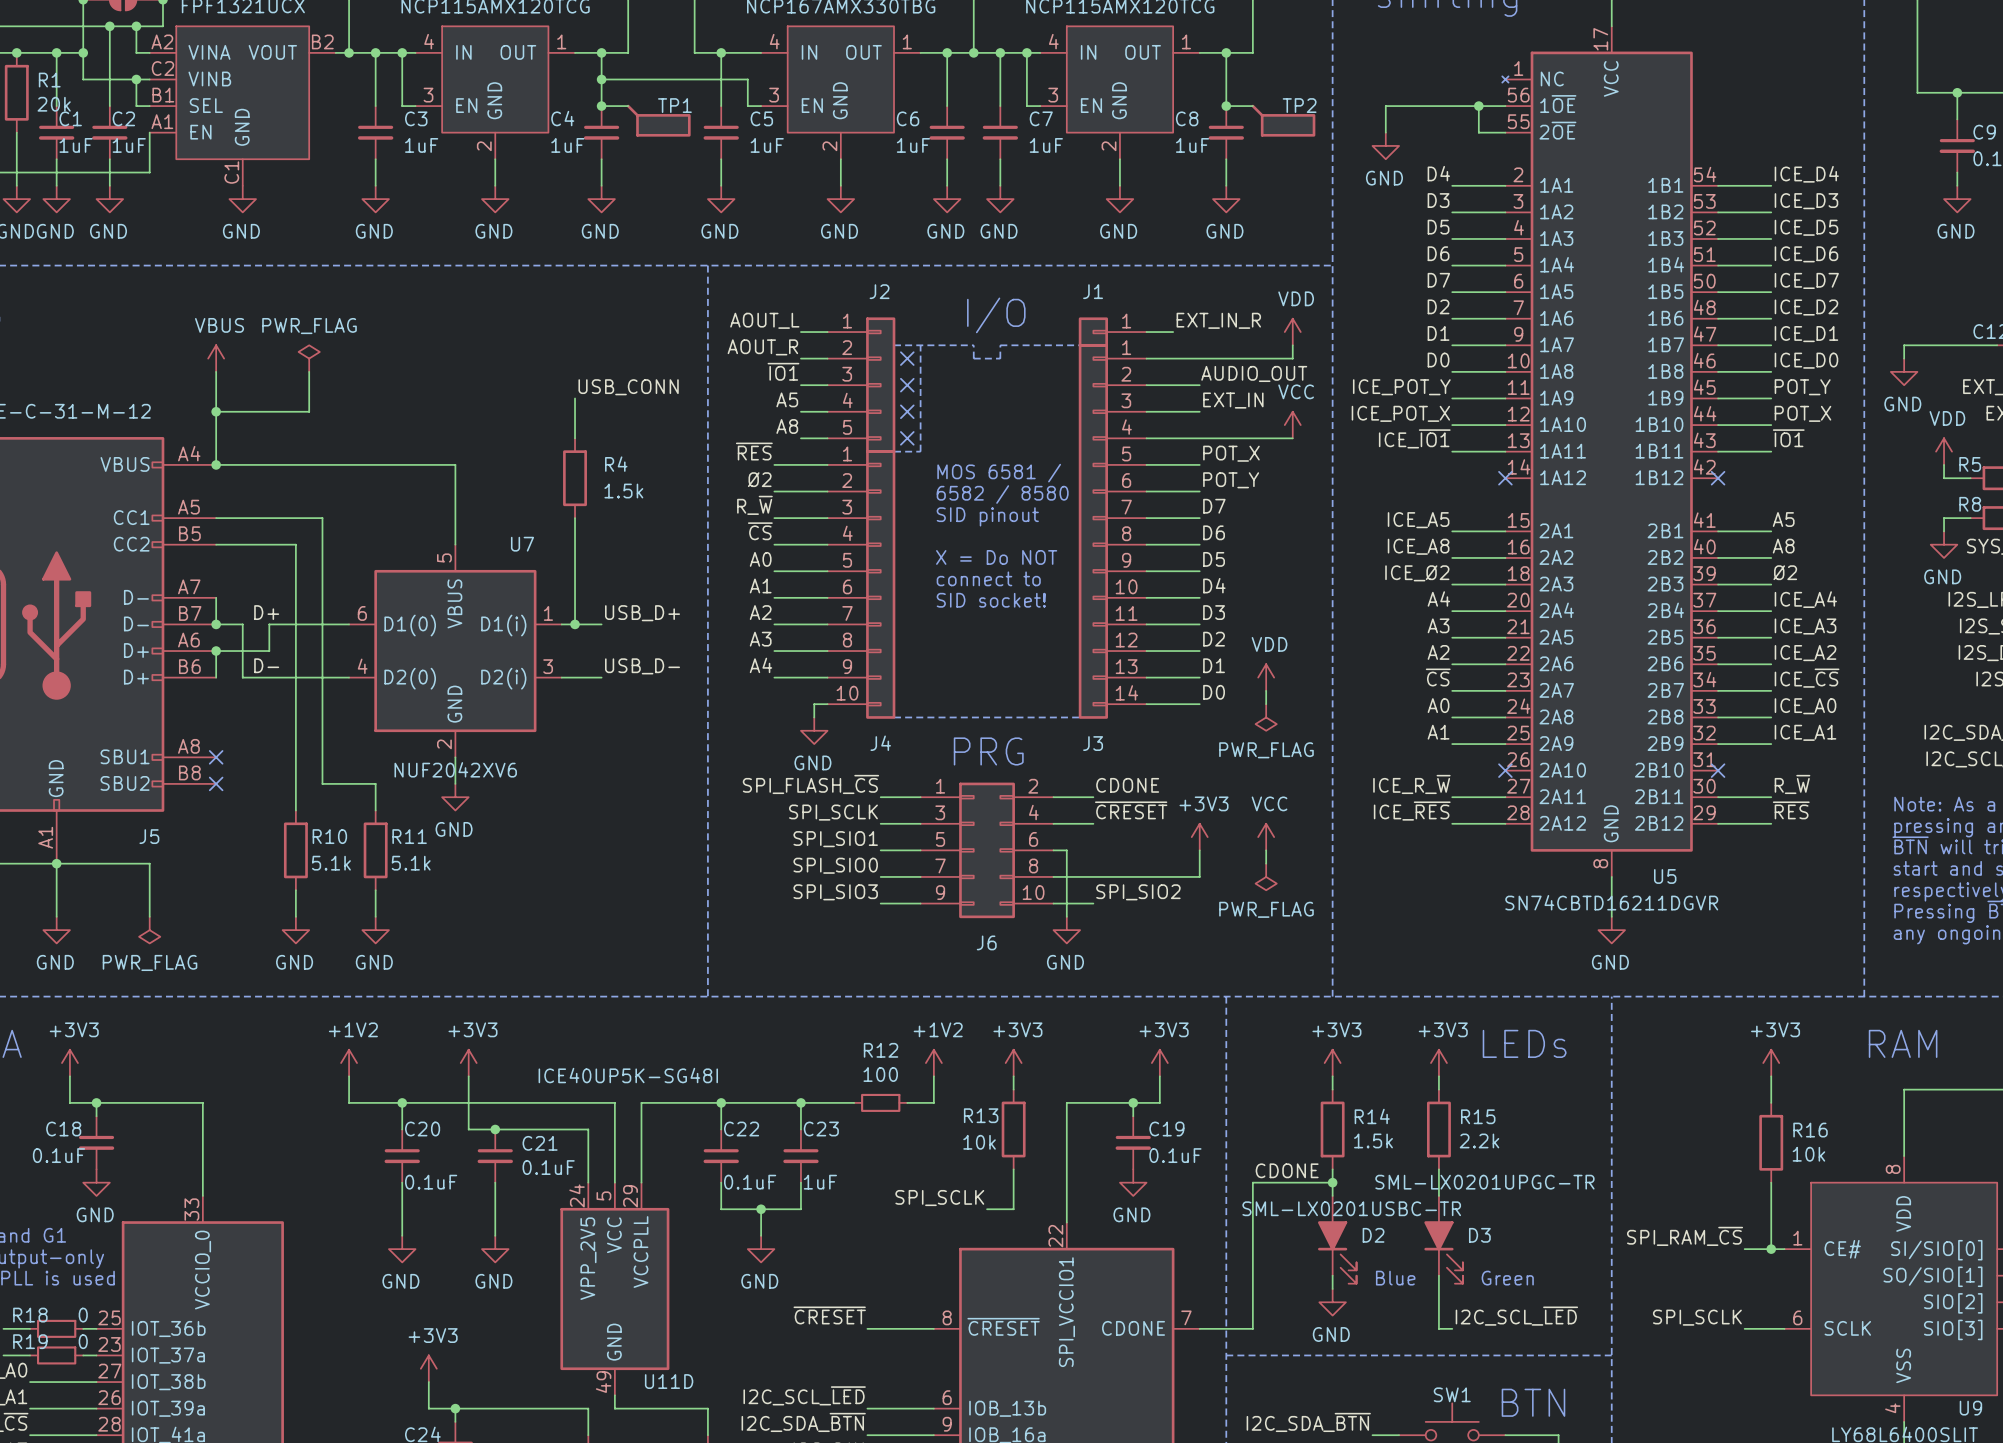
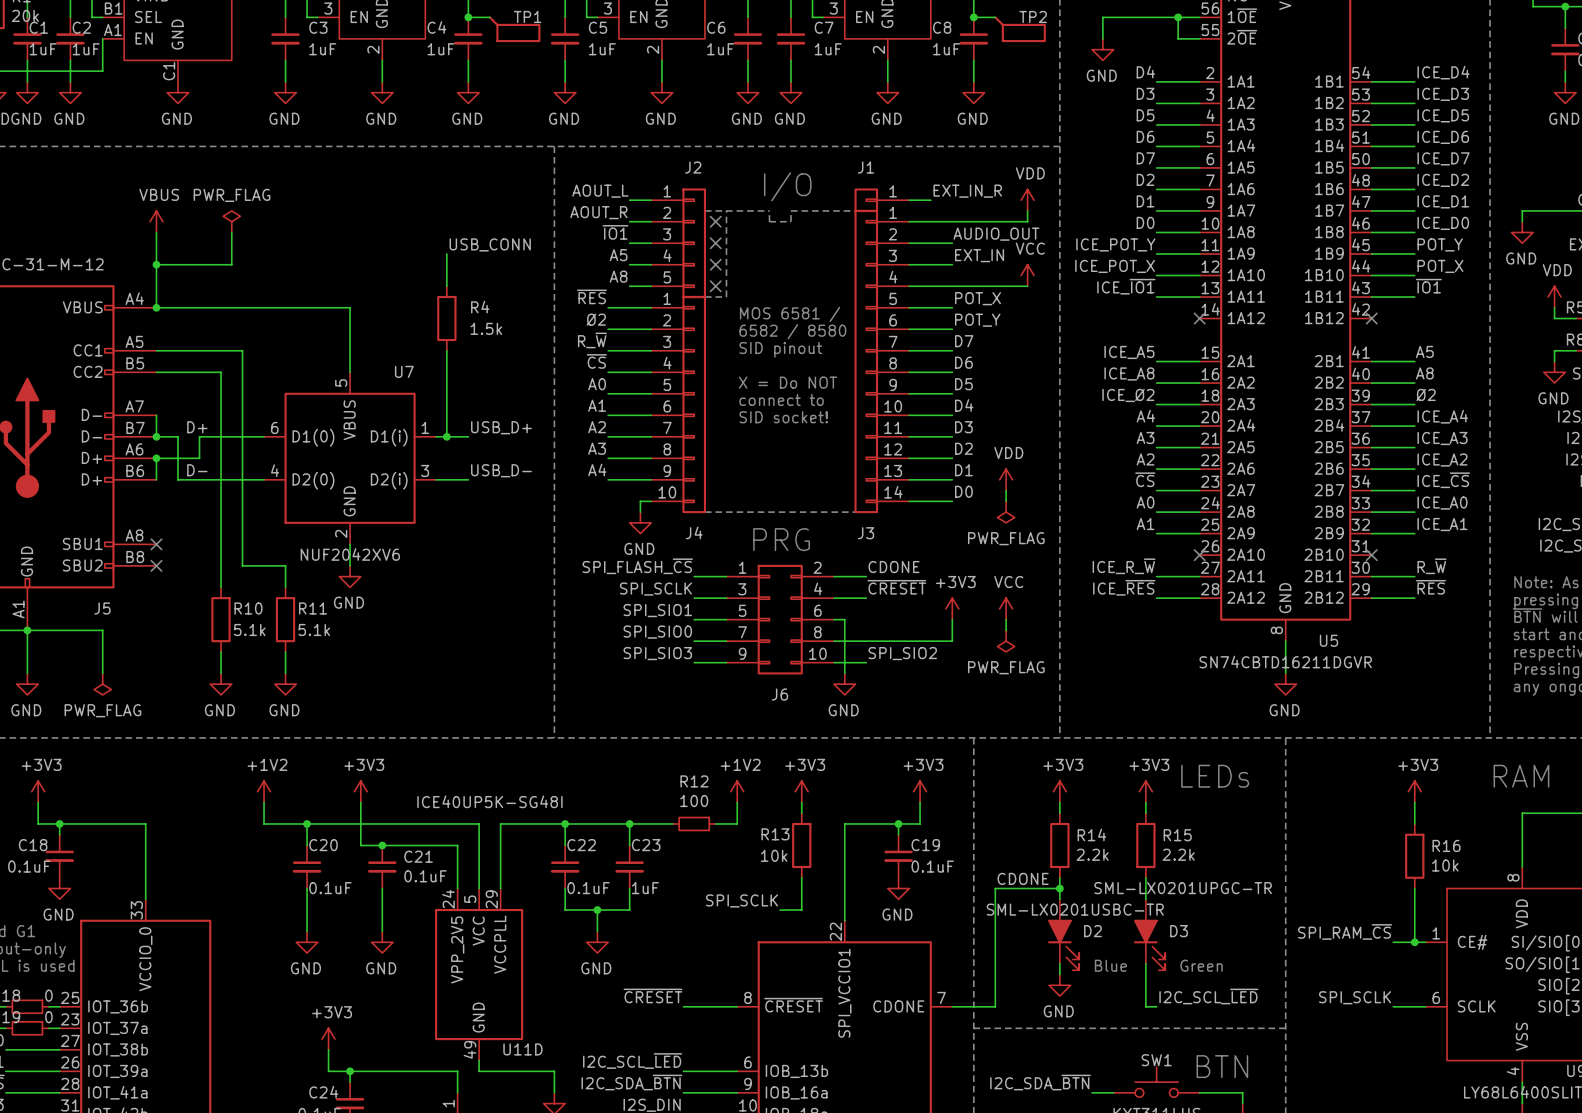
R14 value: 1.5k (1373, 1140) -> 2.2k (1092, 854)

